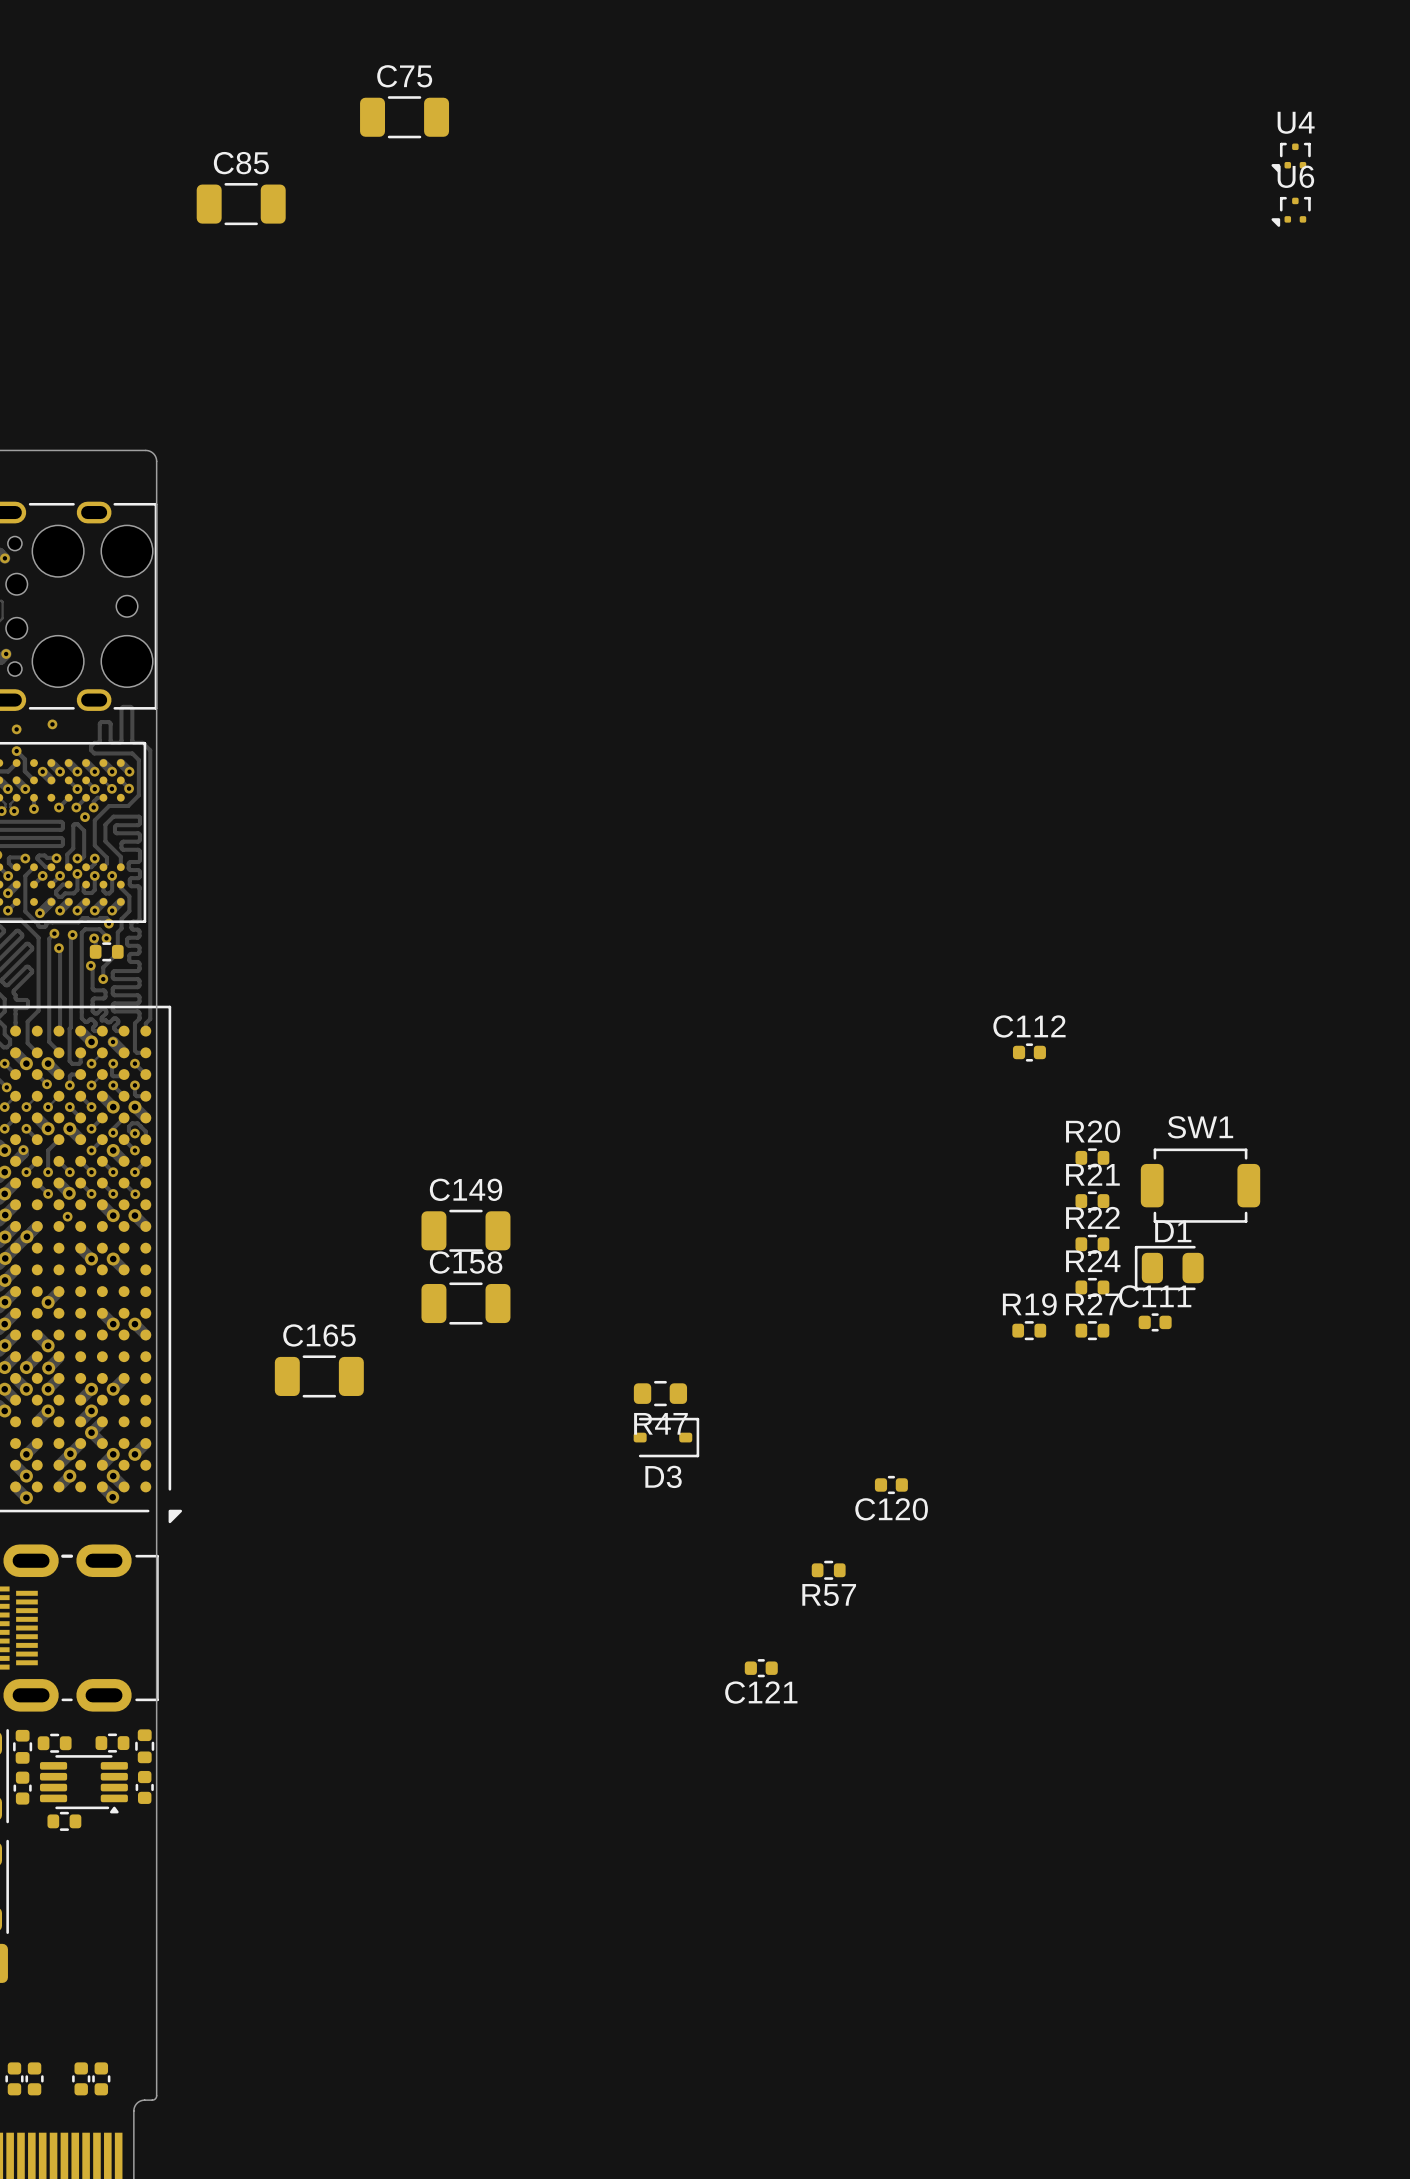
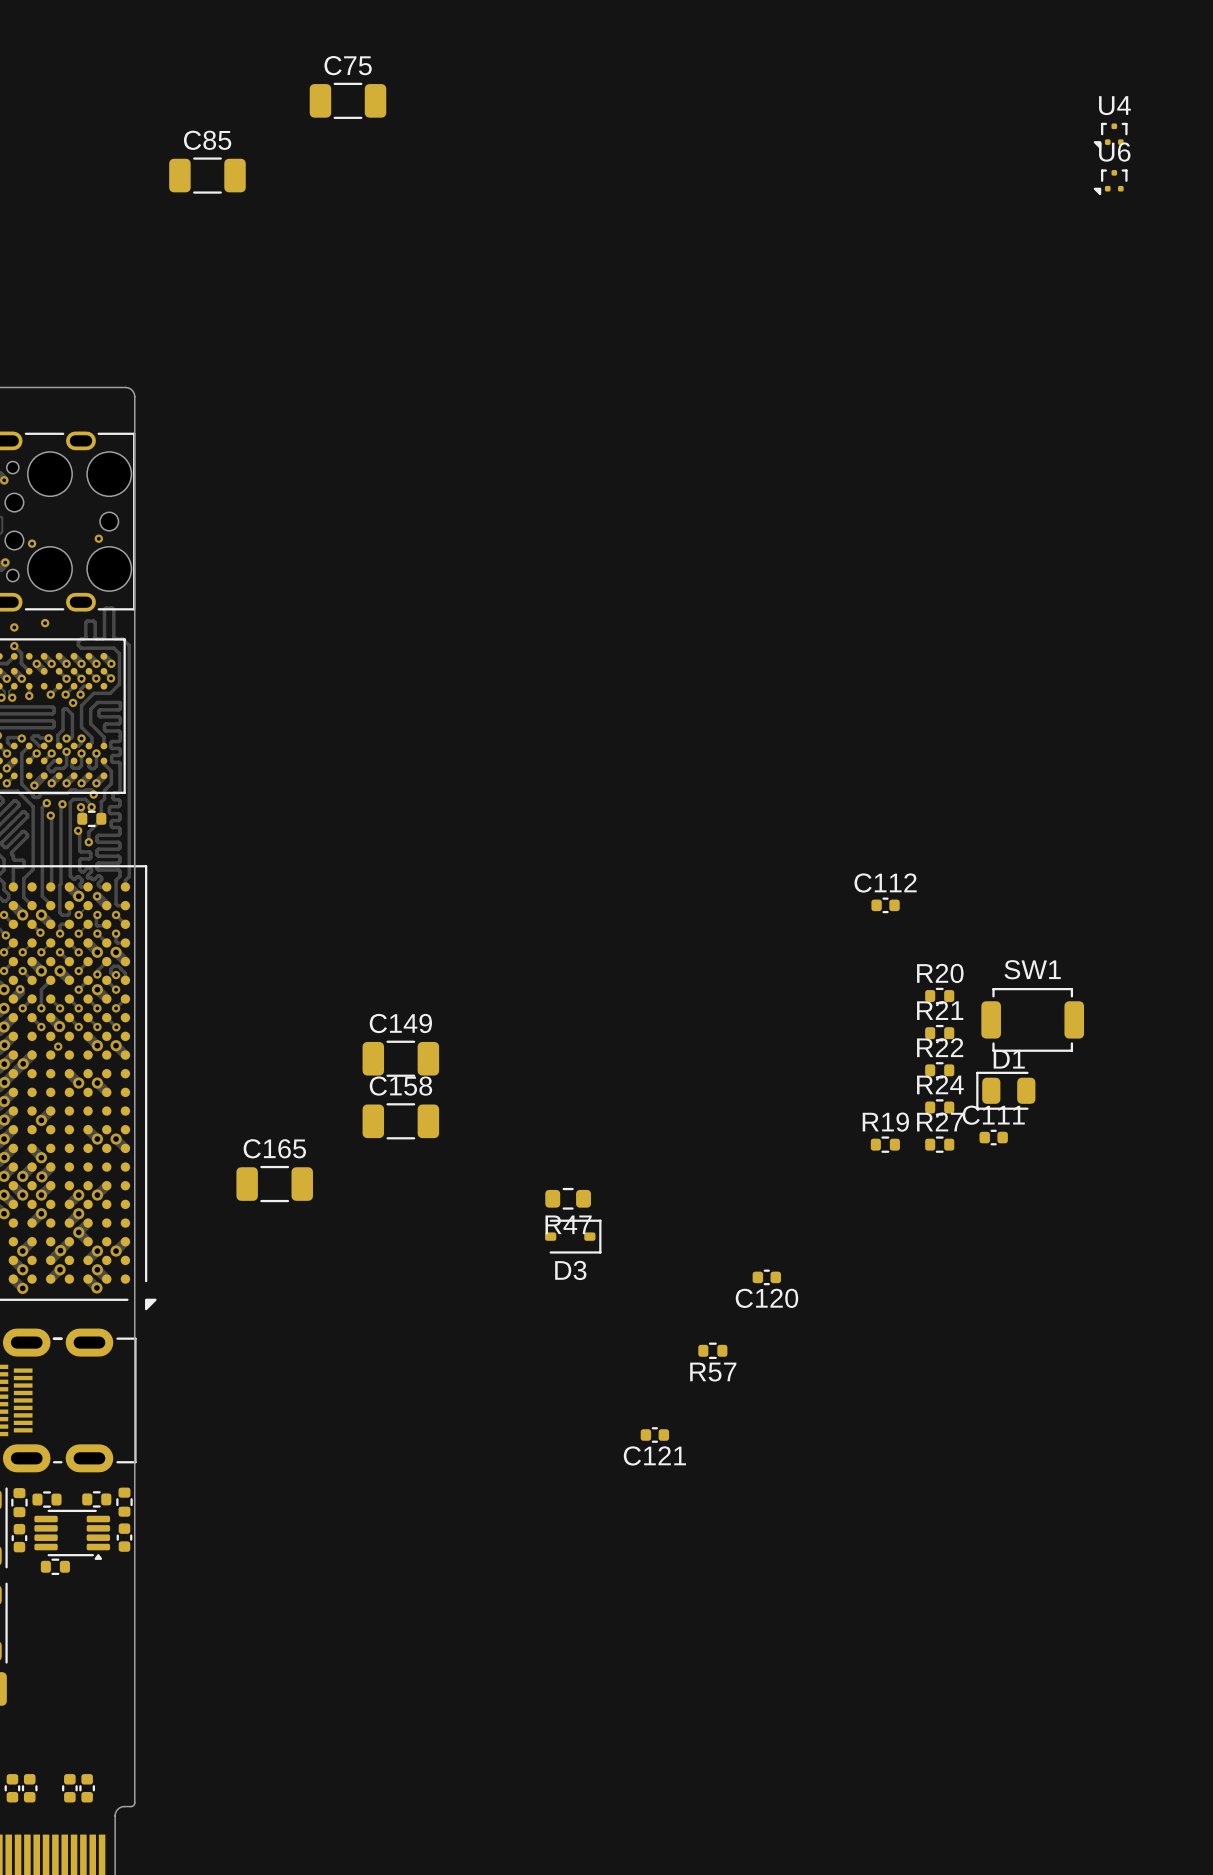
via: none -> (98, 538)
via: none -> (32, 543)

